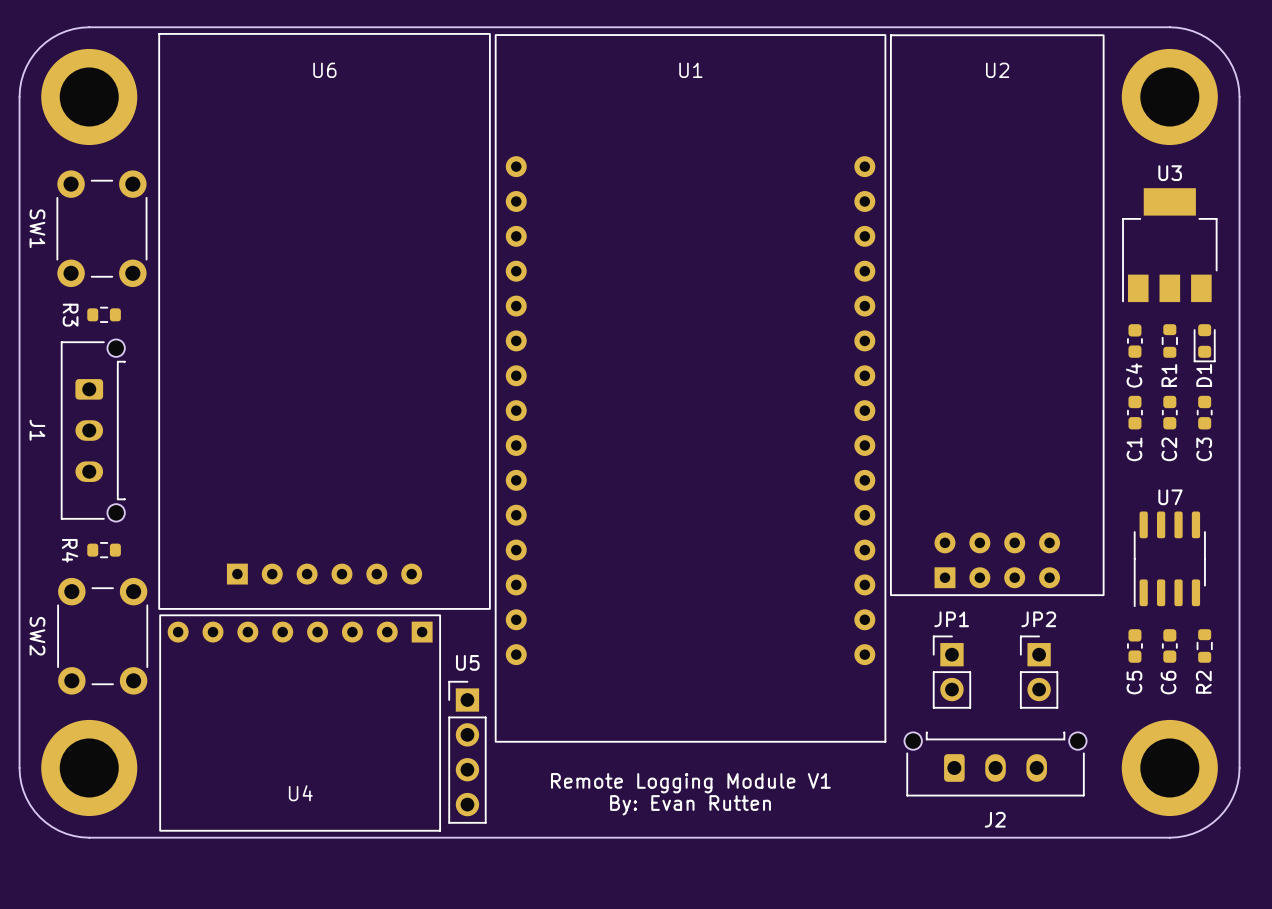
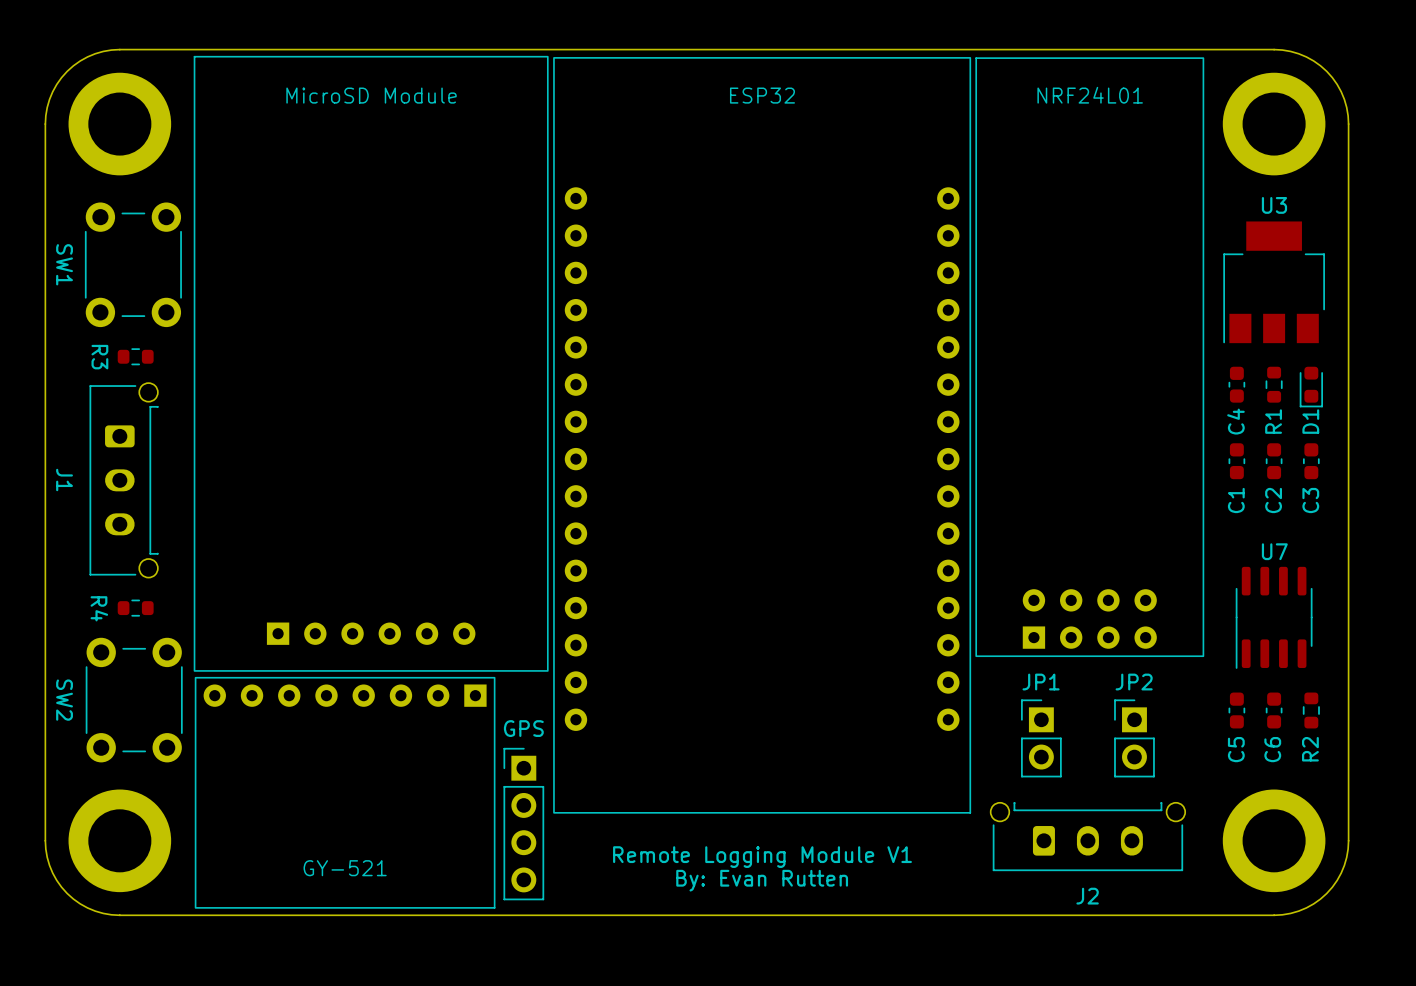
U6 name: U6 (324, 70) -> MicroSD Module (371, 95)
U1 name: U1 (690, 70) -> ESP32 (762, 95)
U2 name: U2 (997, 70) -> NRF24L01 (1090, 95)
U5 name: U5 (467, 662) -> GPS (523, 728)
U4 name: U4 (300, 793) -> GY-521 (345, 868)

